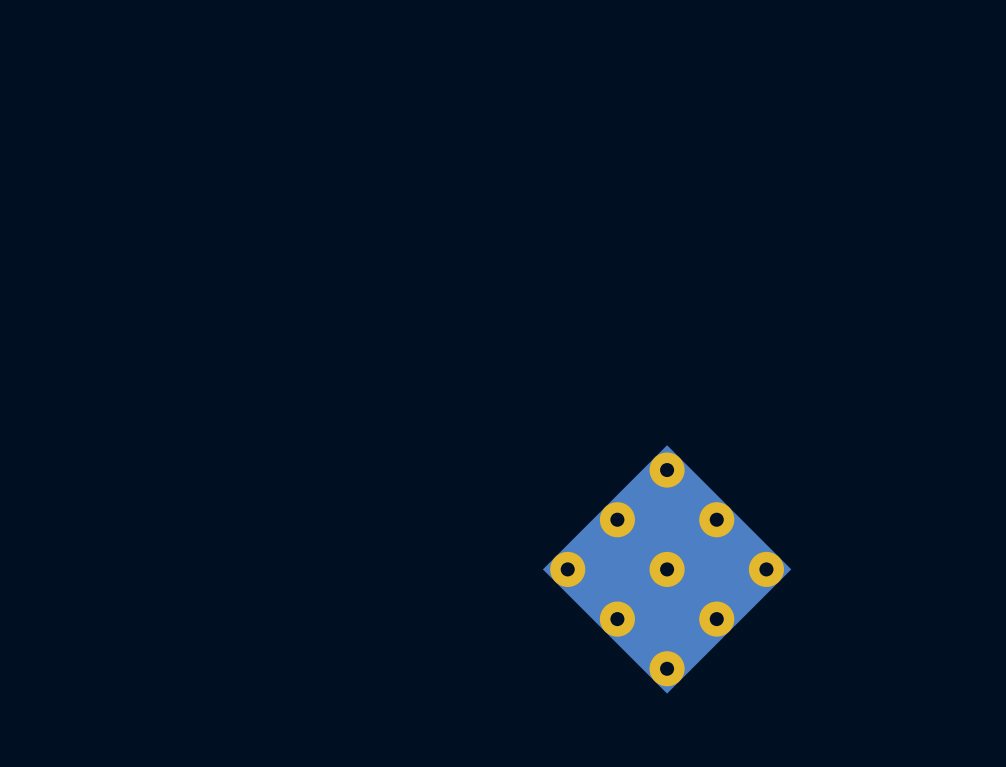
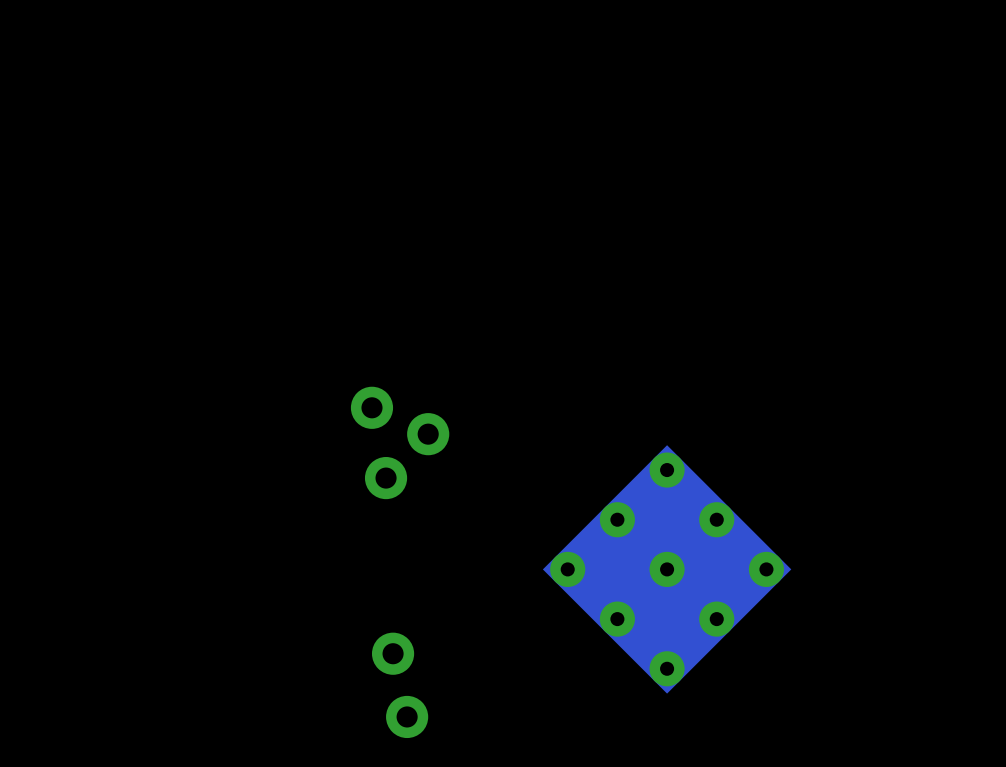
via: none -> (371, 407)
via: none -> (428, 434)
via: none -> (386, 478)
via: none -> (393, 653)
via: none -> (407, 716)

